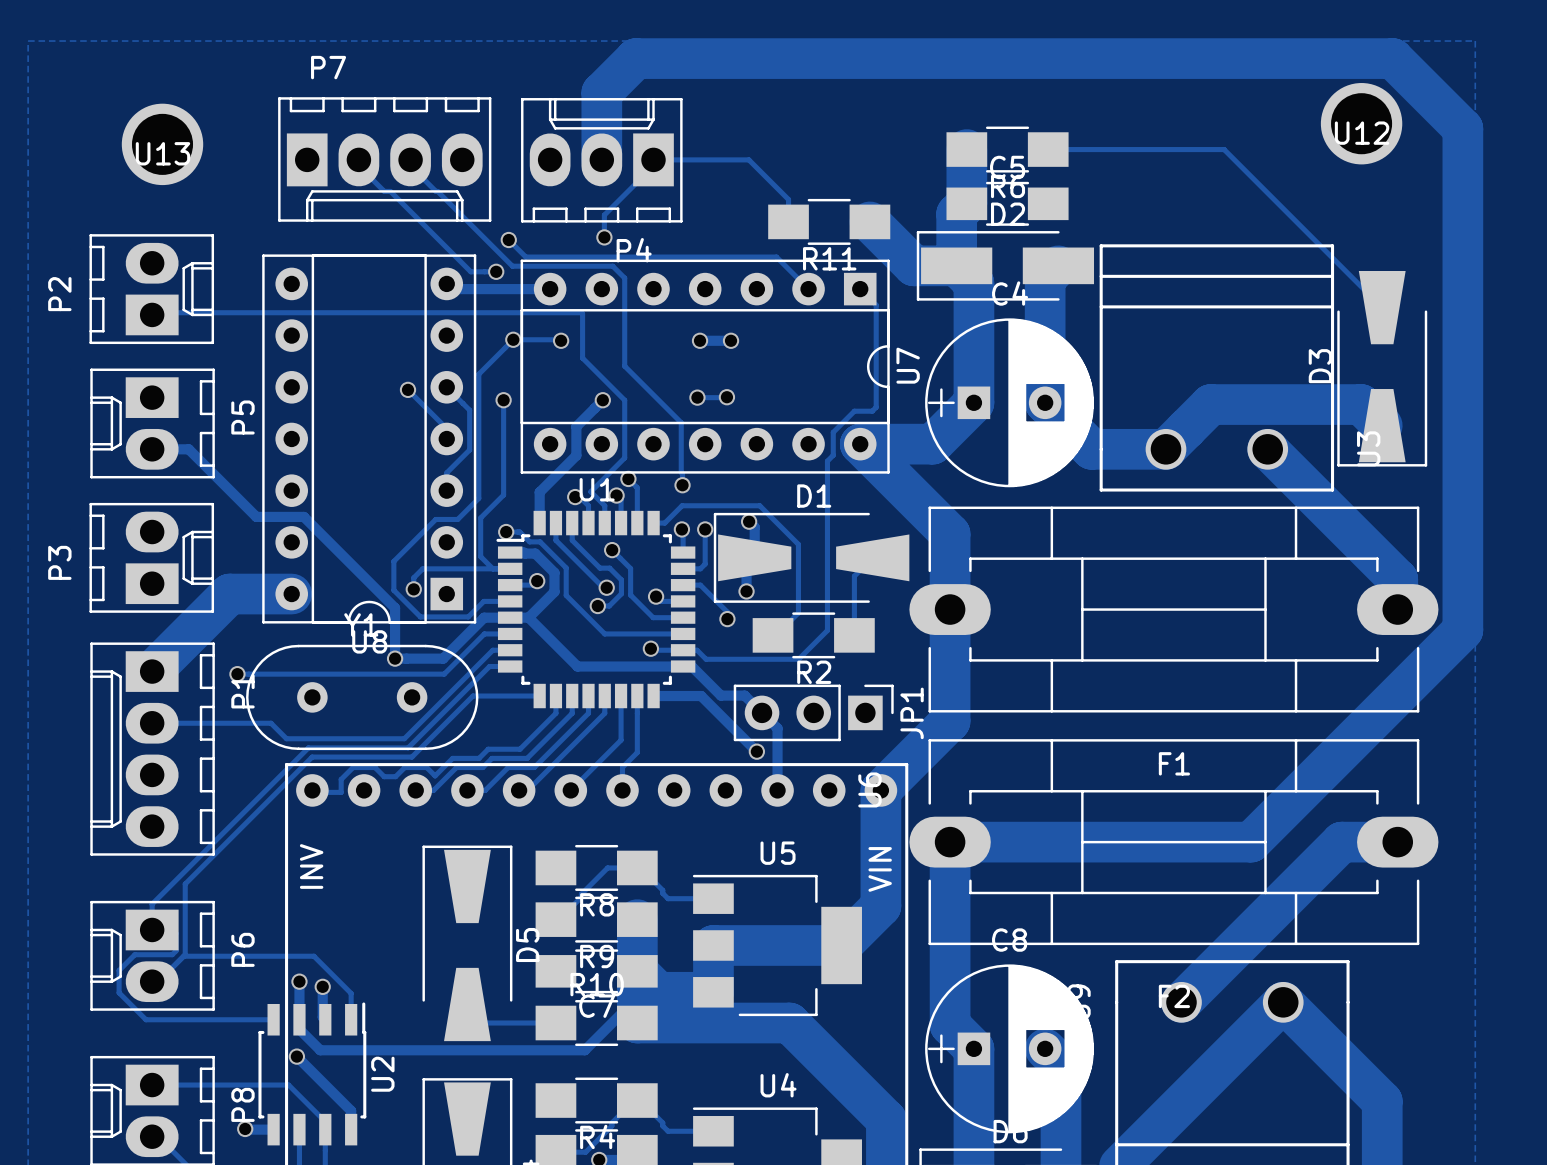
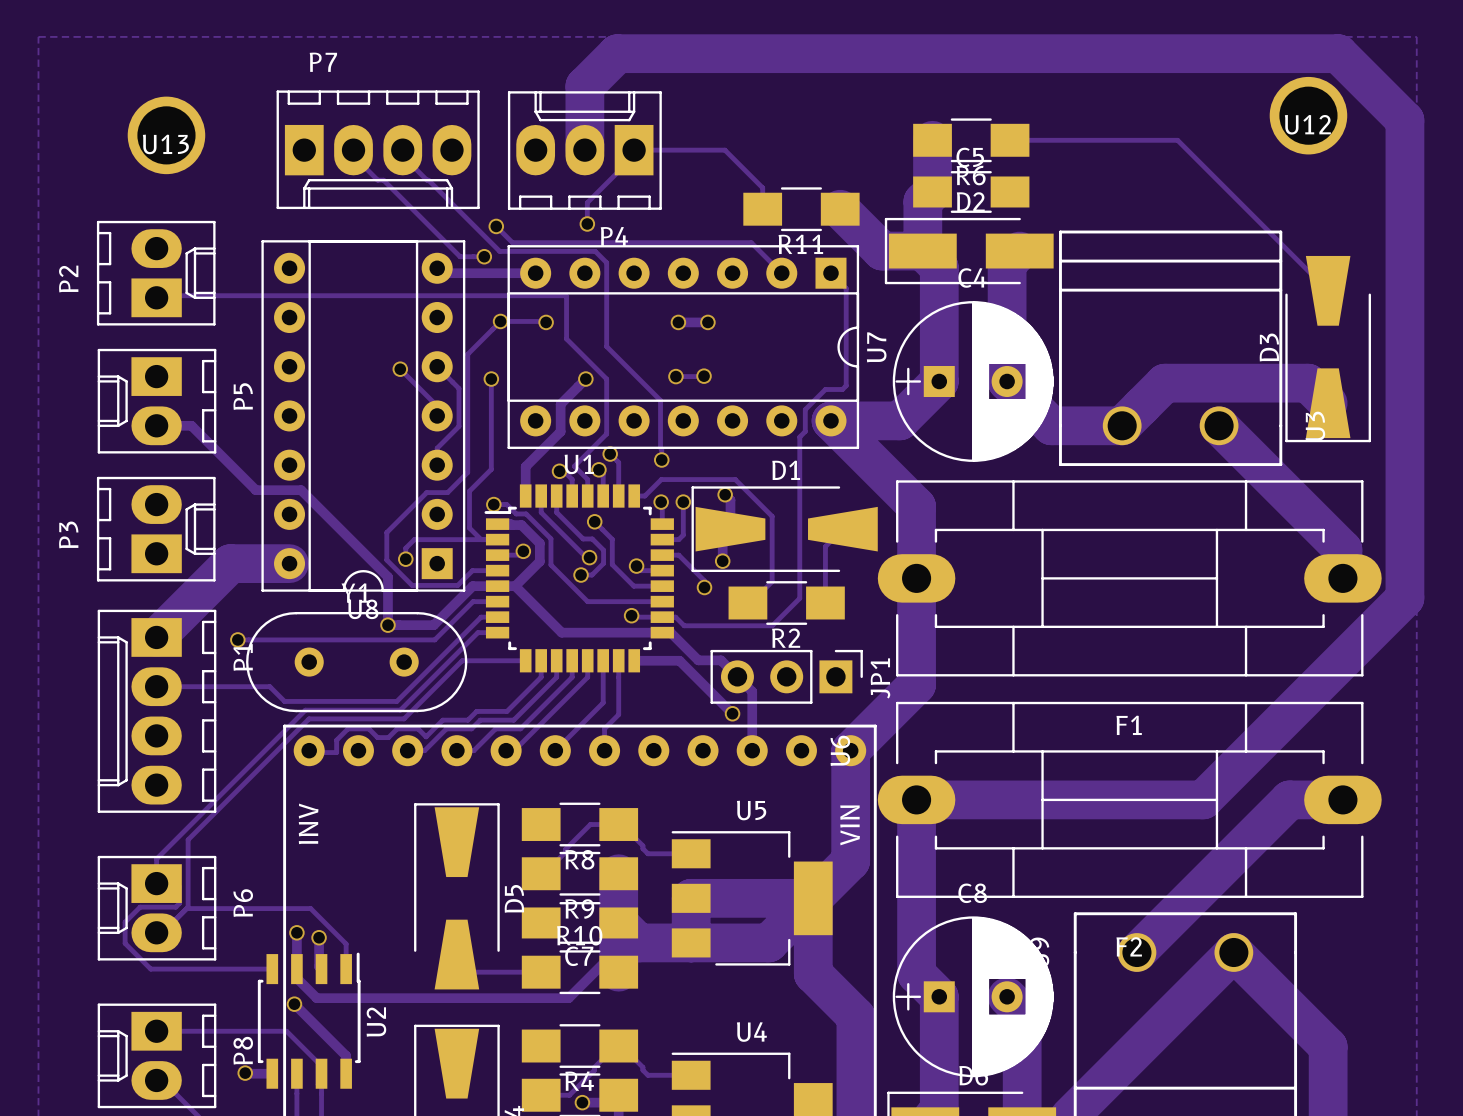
track: (637, 1023) (789, 1023) (886, 1119) -> (691, 942) (768, 942) (813, 898) (813, 973) (855, 1016) (855, 1064)

